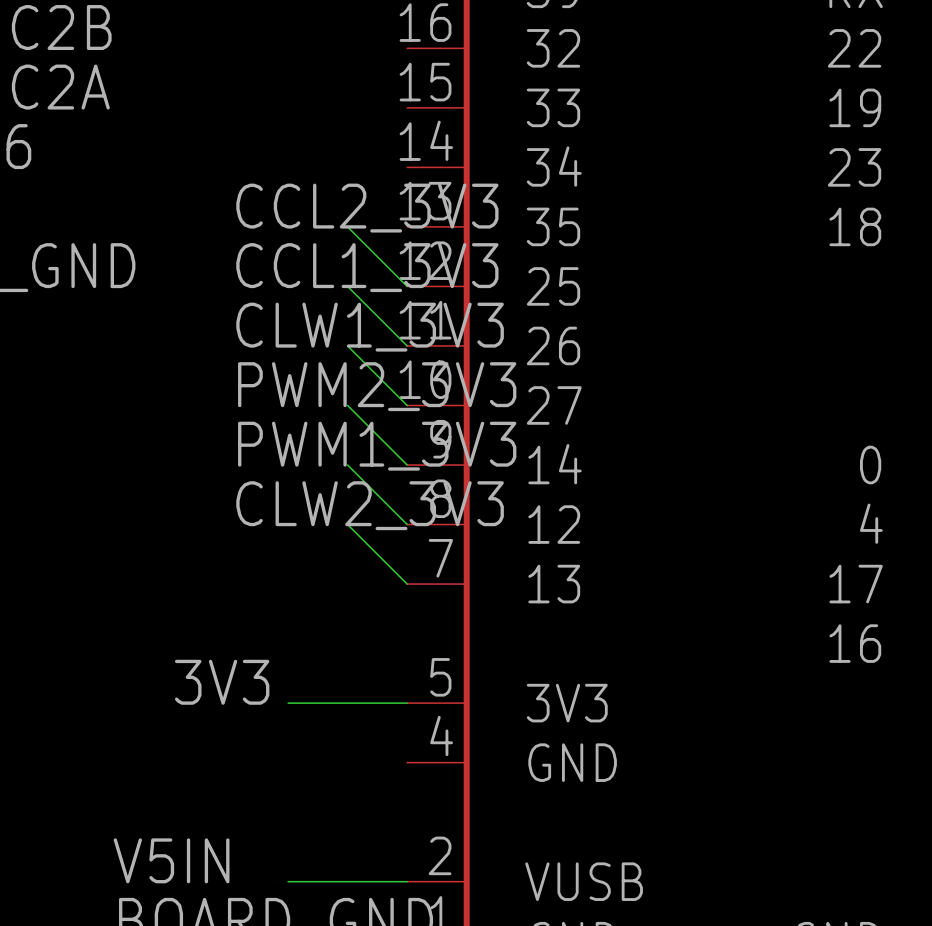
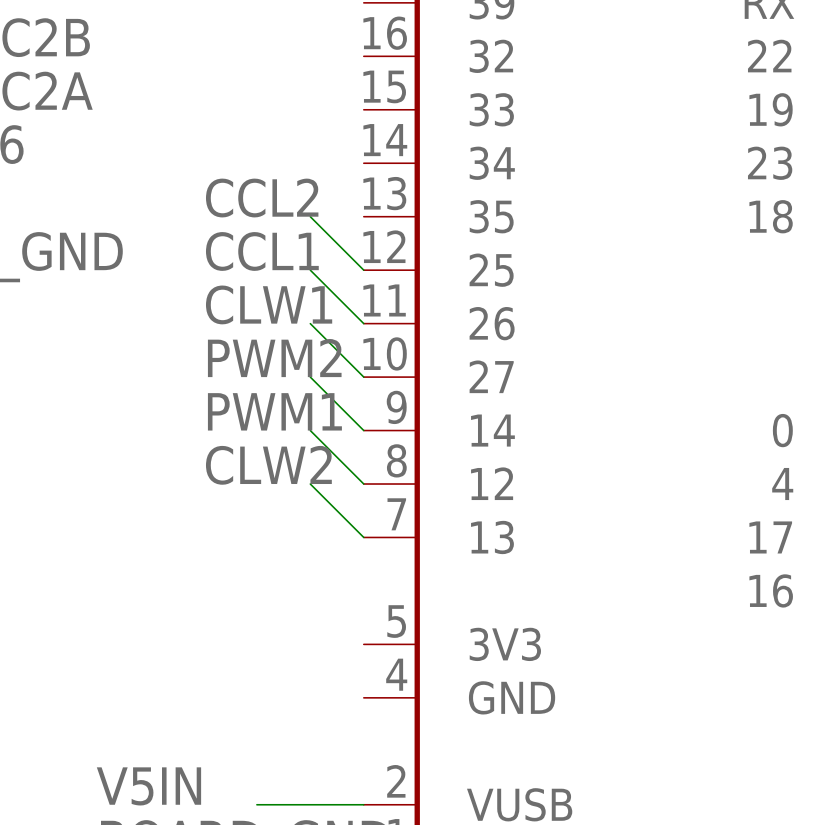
label: CCL2_3V3 (367, 208) -> CCL2 (262, 198)
label: CCL1_3V3 (367, 267) -> CCL1 (262, 251)
label: CLW1_3V3 (370, 327) -> CLW1 (269, 304)
label: PWM2_3V3 (377, 386) -> PWM2 (274, 358)
label: PWM1_3V3 (377, 446) -> PWM1 (274, 411)
label: CLW2_3V3 (370, 505) -> CLW2 (268, 465)
label: 3V3 (222, 682) -> none
wire: (288, 703) (407, 703) -> none

